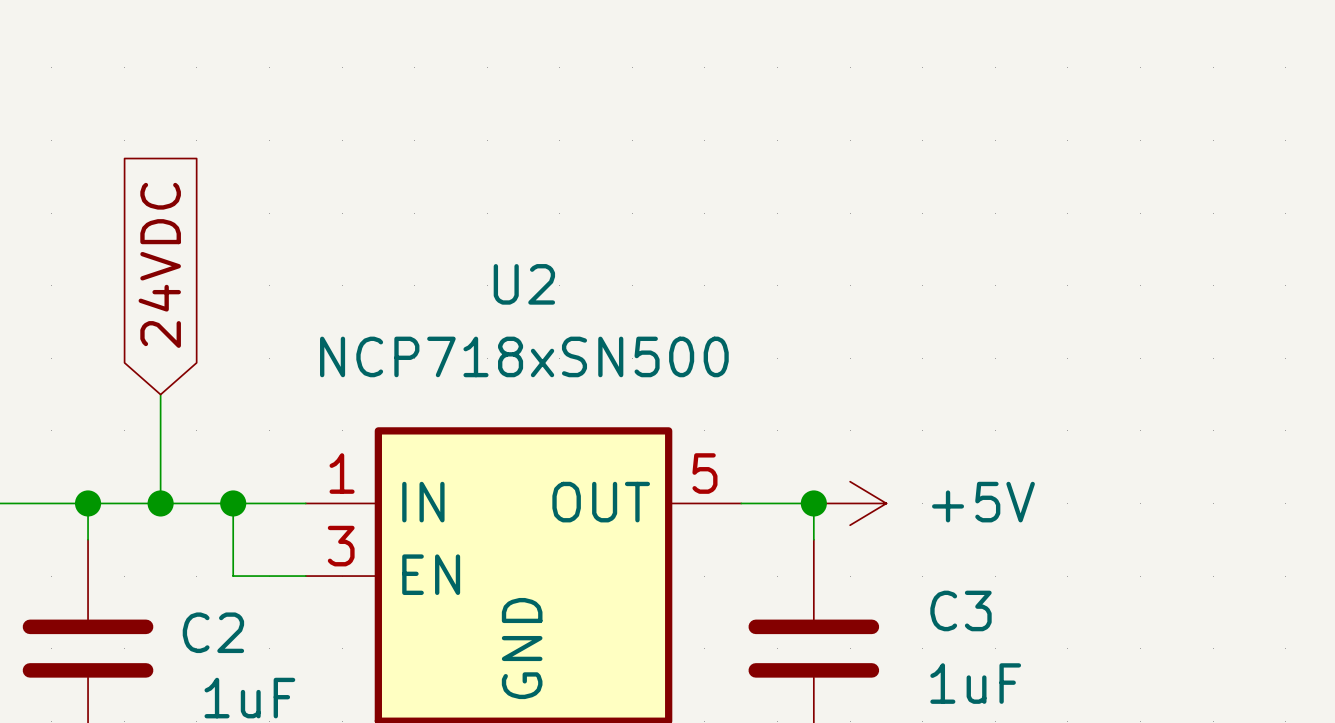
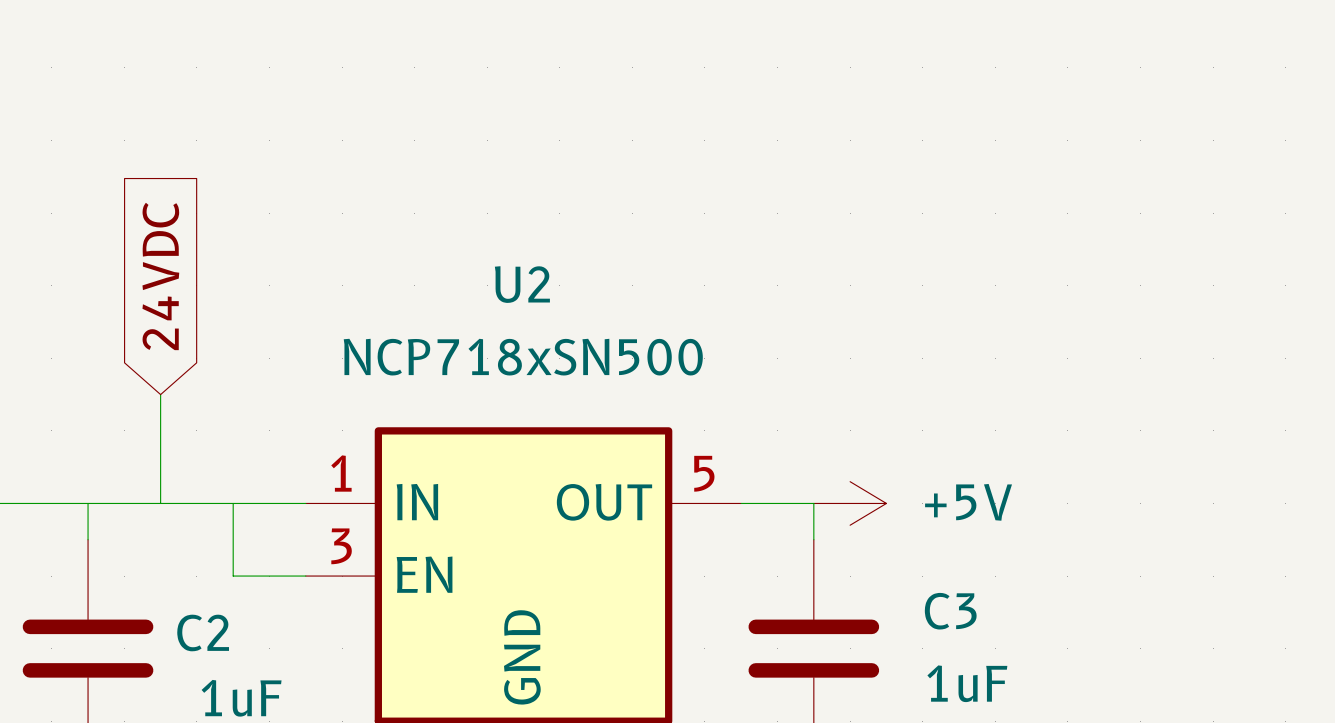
junction: (88, 503) -> none
junction: (160, 503) -> none
junction: (233, 503) -> none
junction: (813, 503) -> none

